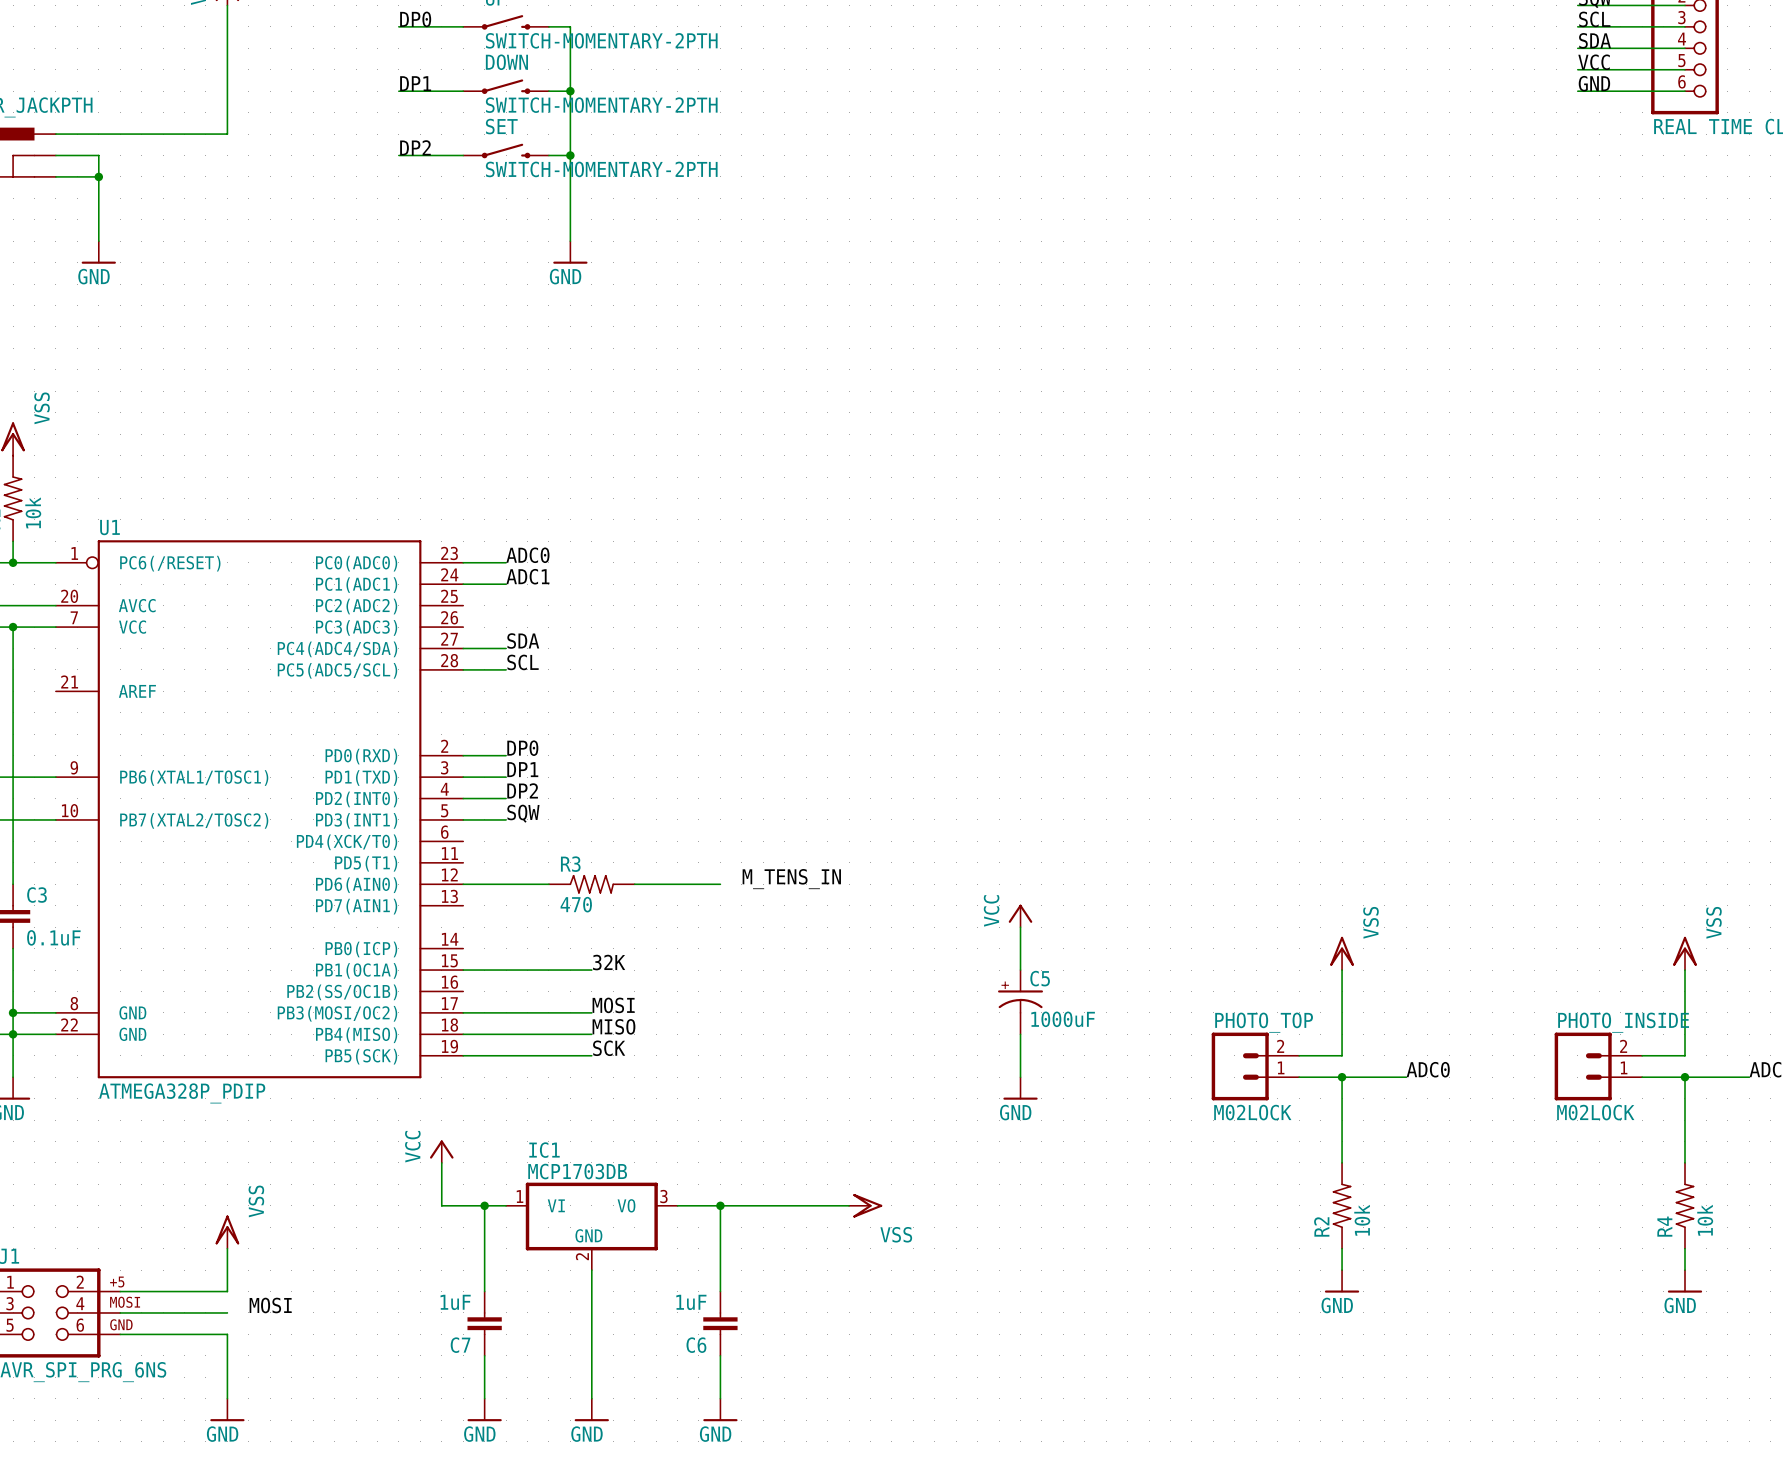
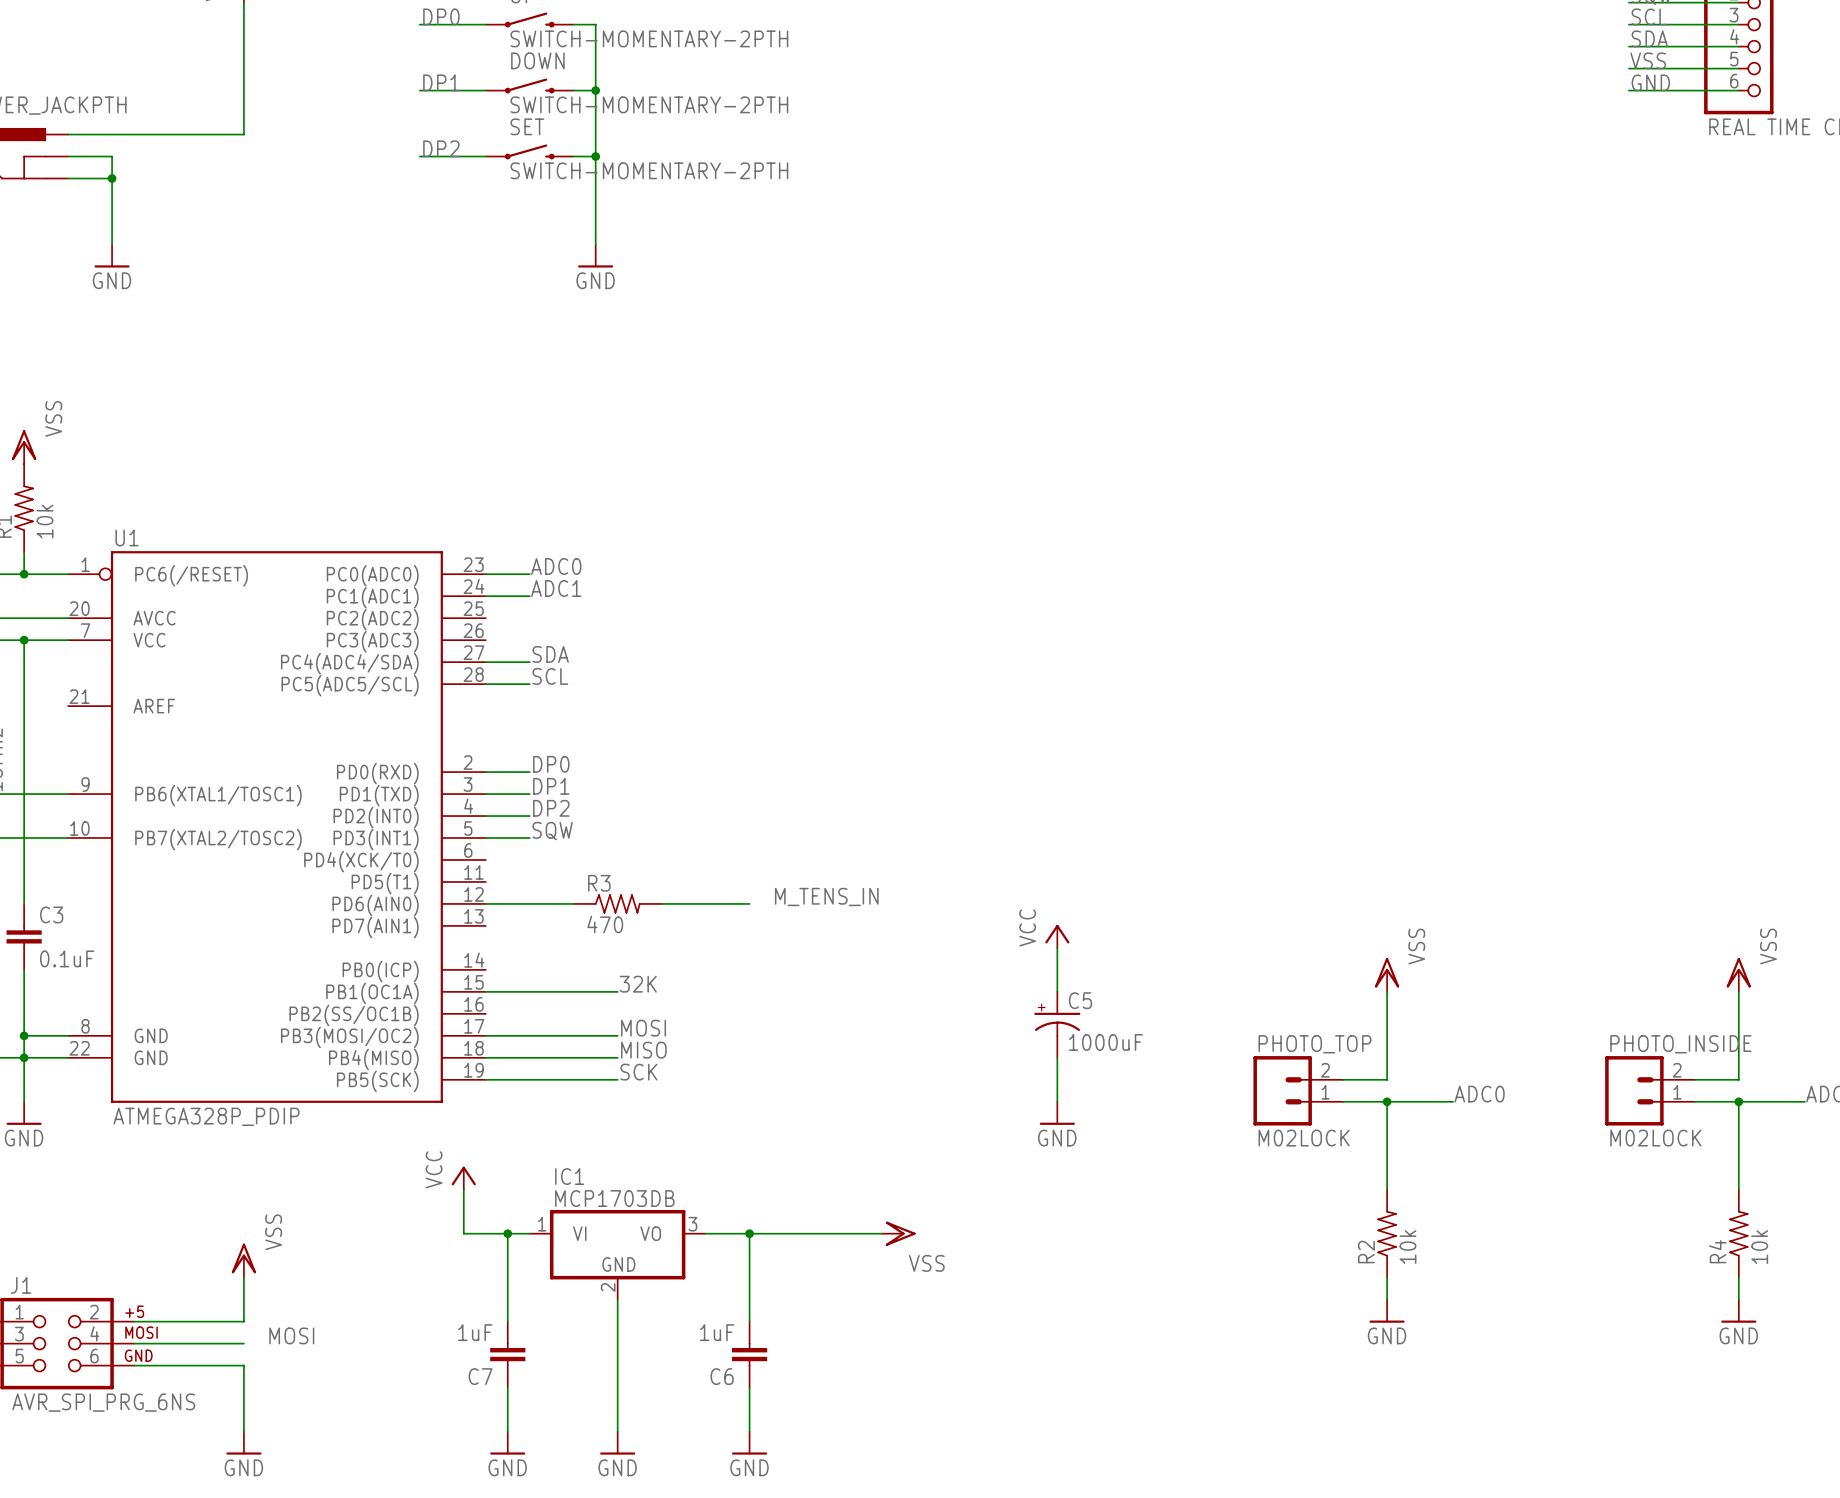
label: VCC (1594, 62) -> VSS (1648, 60)

